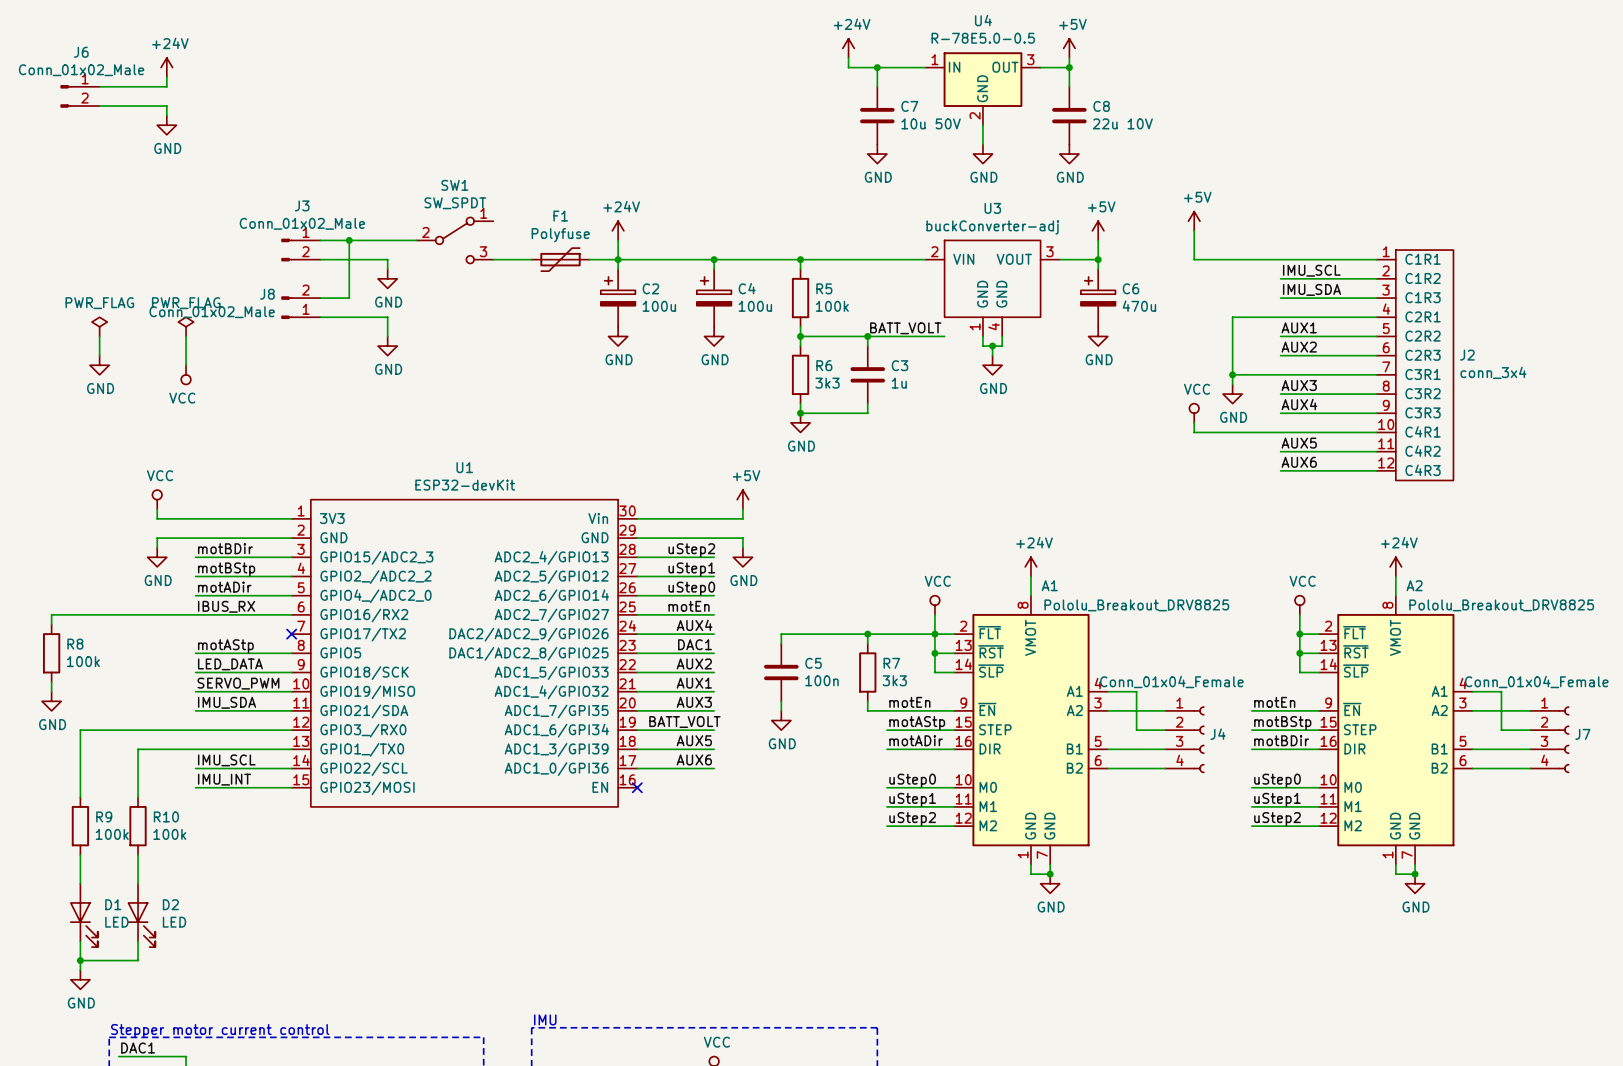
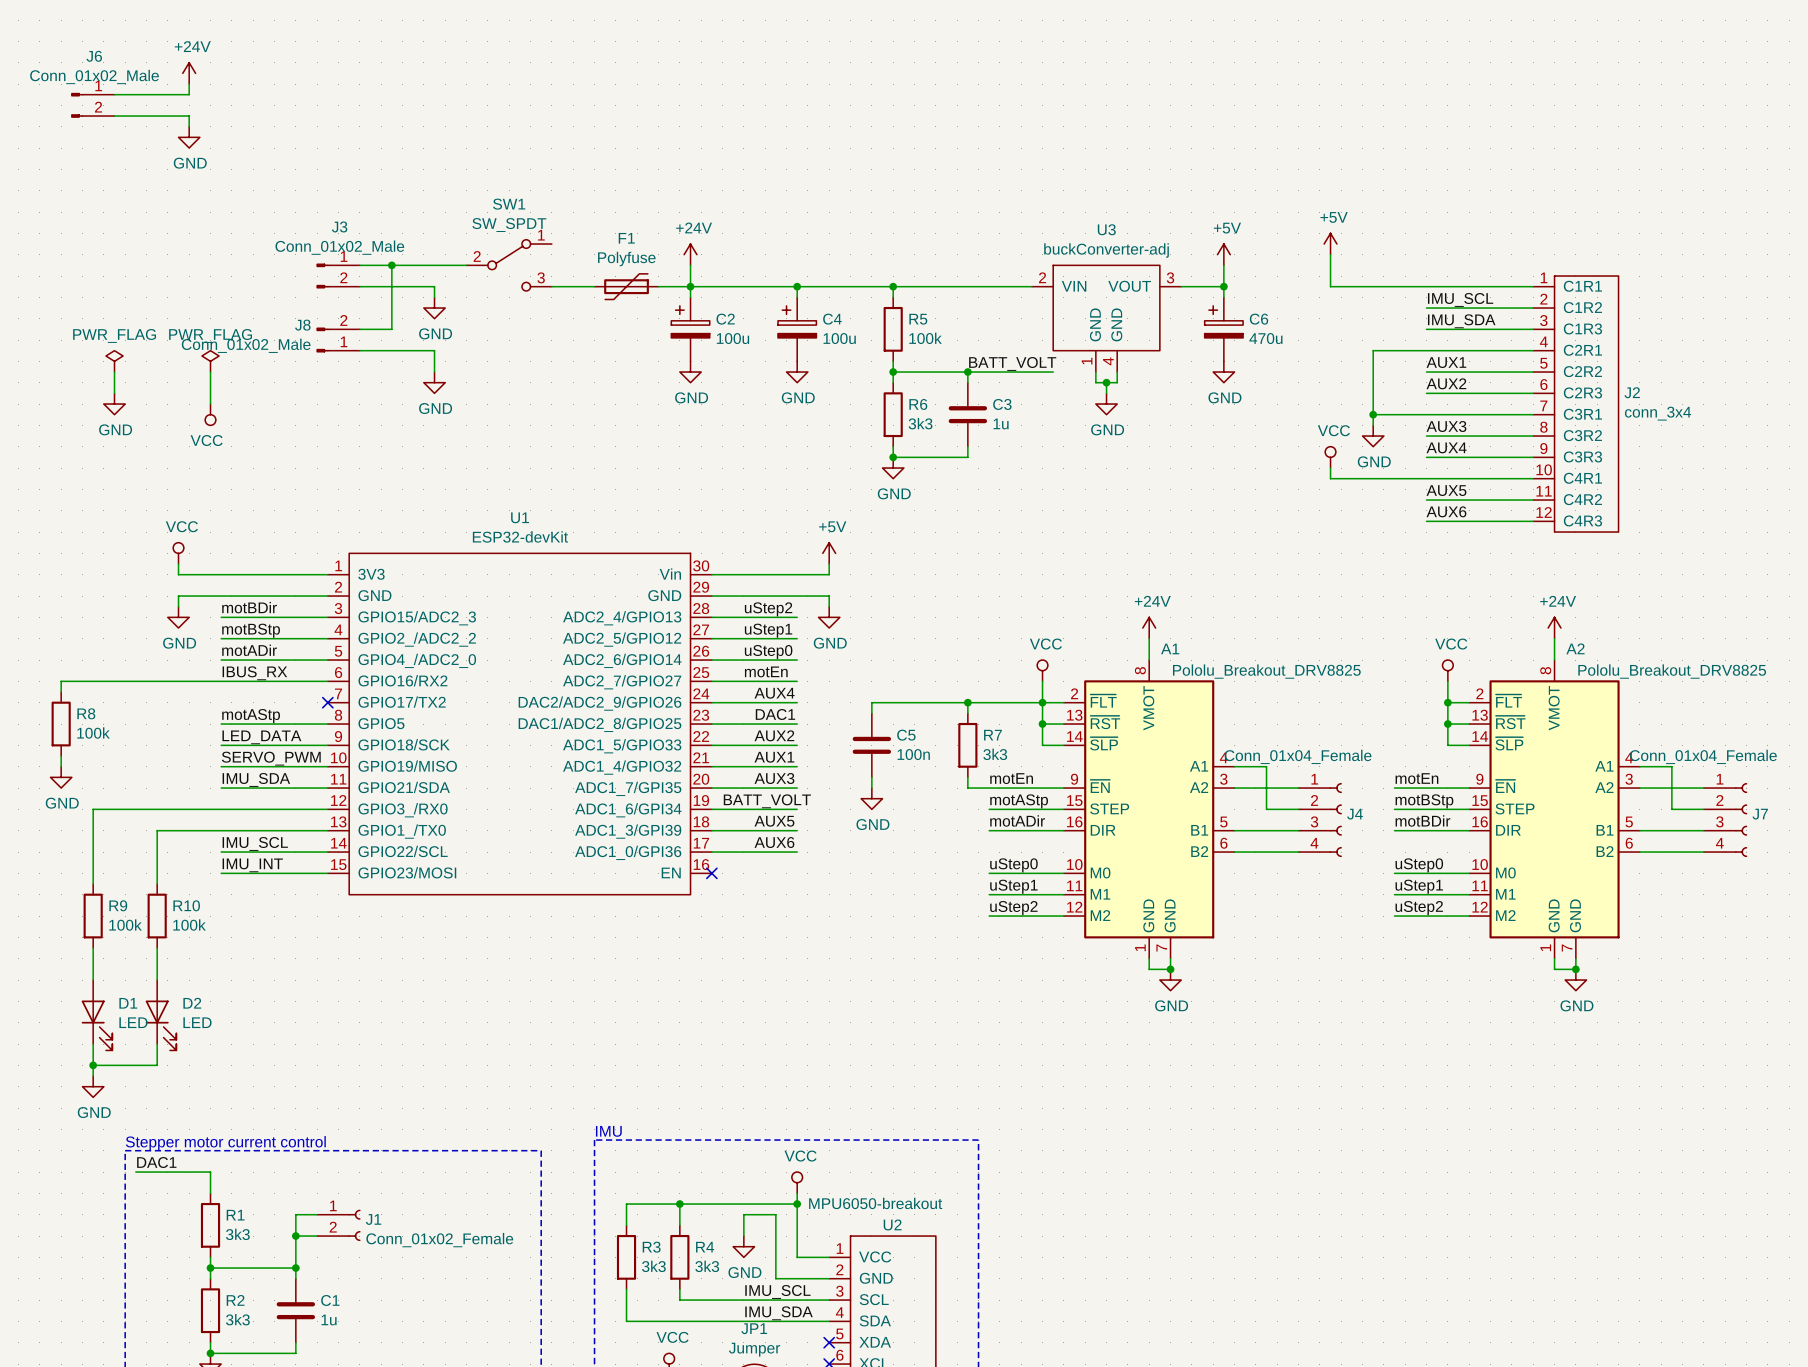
power symbol: +24V (848, 48) -> none
power symbol: +5V (1069, 48) -> none
wire: (848, 58) (848, 67) (925, 67) -> none
wire: (1069, 58) (1069, 86) -> none
wire: (877, 67) (877, 86) -> none
junction: (877, 67) -> none
wire: (1040, 67) (1069, 67) -> none
junction: (1069, 67) -> none
U4: R-78E5.0-0.5 (982, 88) -> none
C7: 10u 50V (877, 115) -> none
C8: 22u 10V (1069, 115) -> none
wire: (982, 125) (982, 144) -> none
power symbol: GND (877, 154) -> none
power symbol: GND (982, 154) -> none
power symbol: GND (1069, 154) -> none

